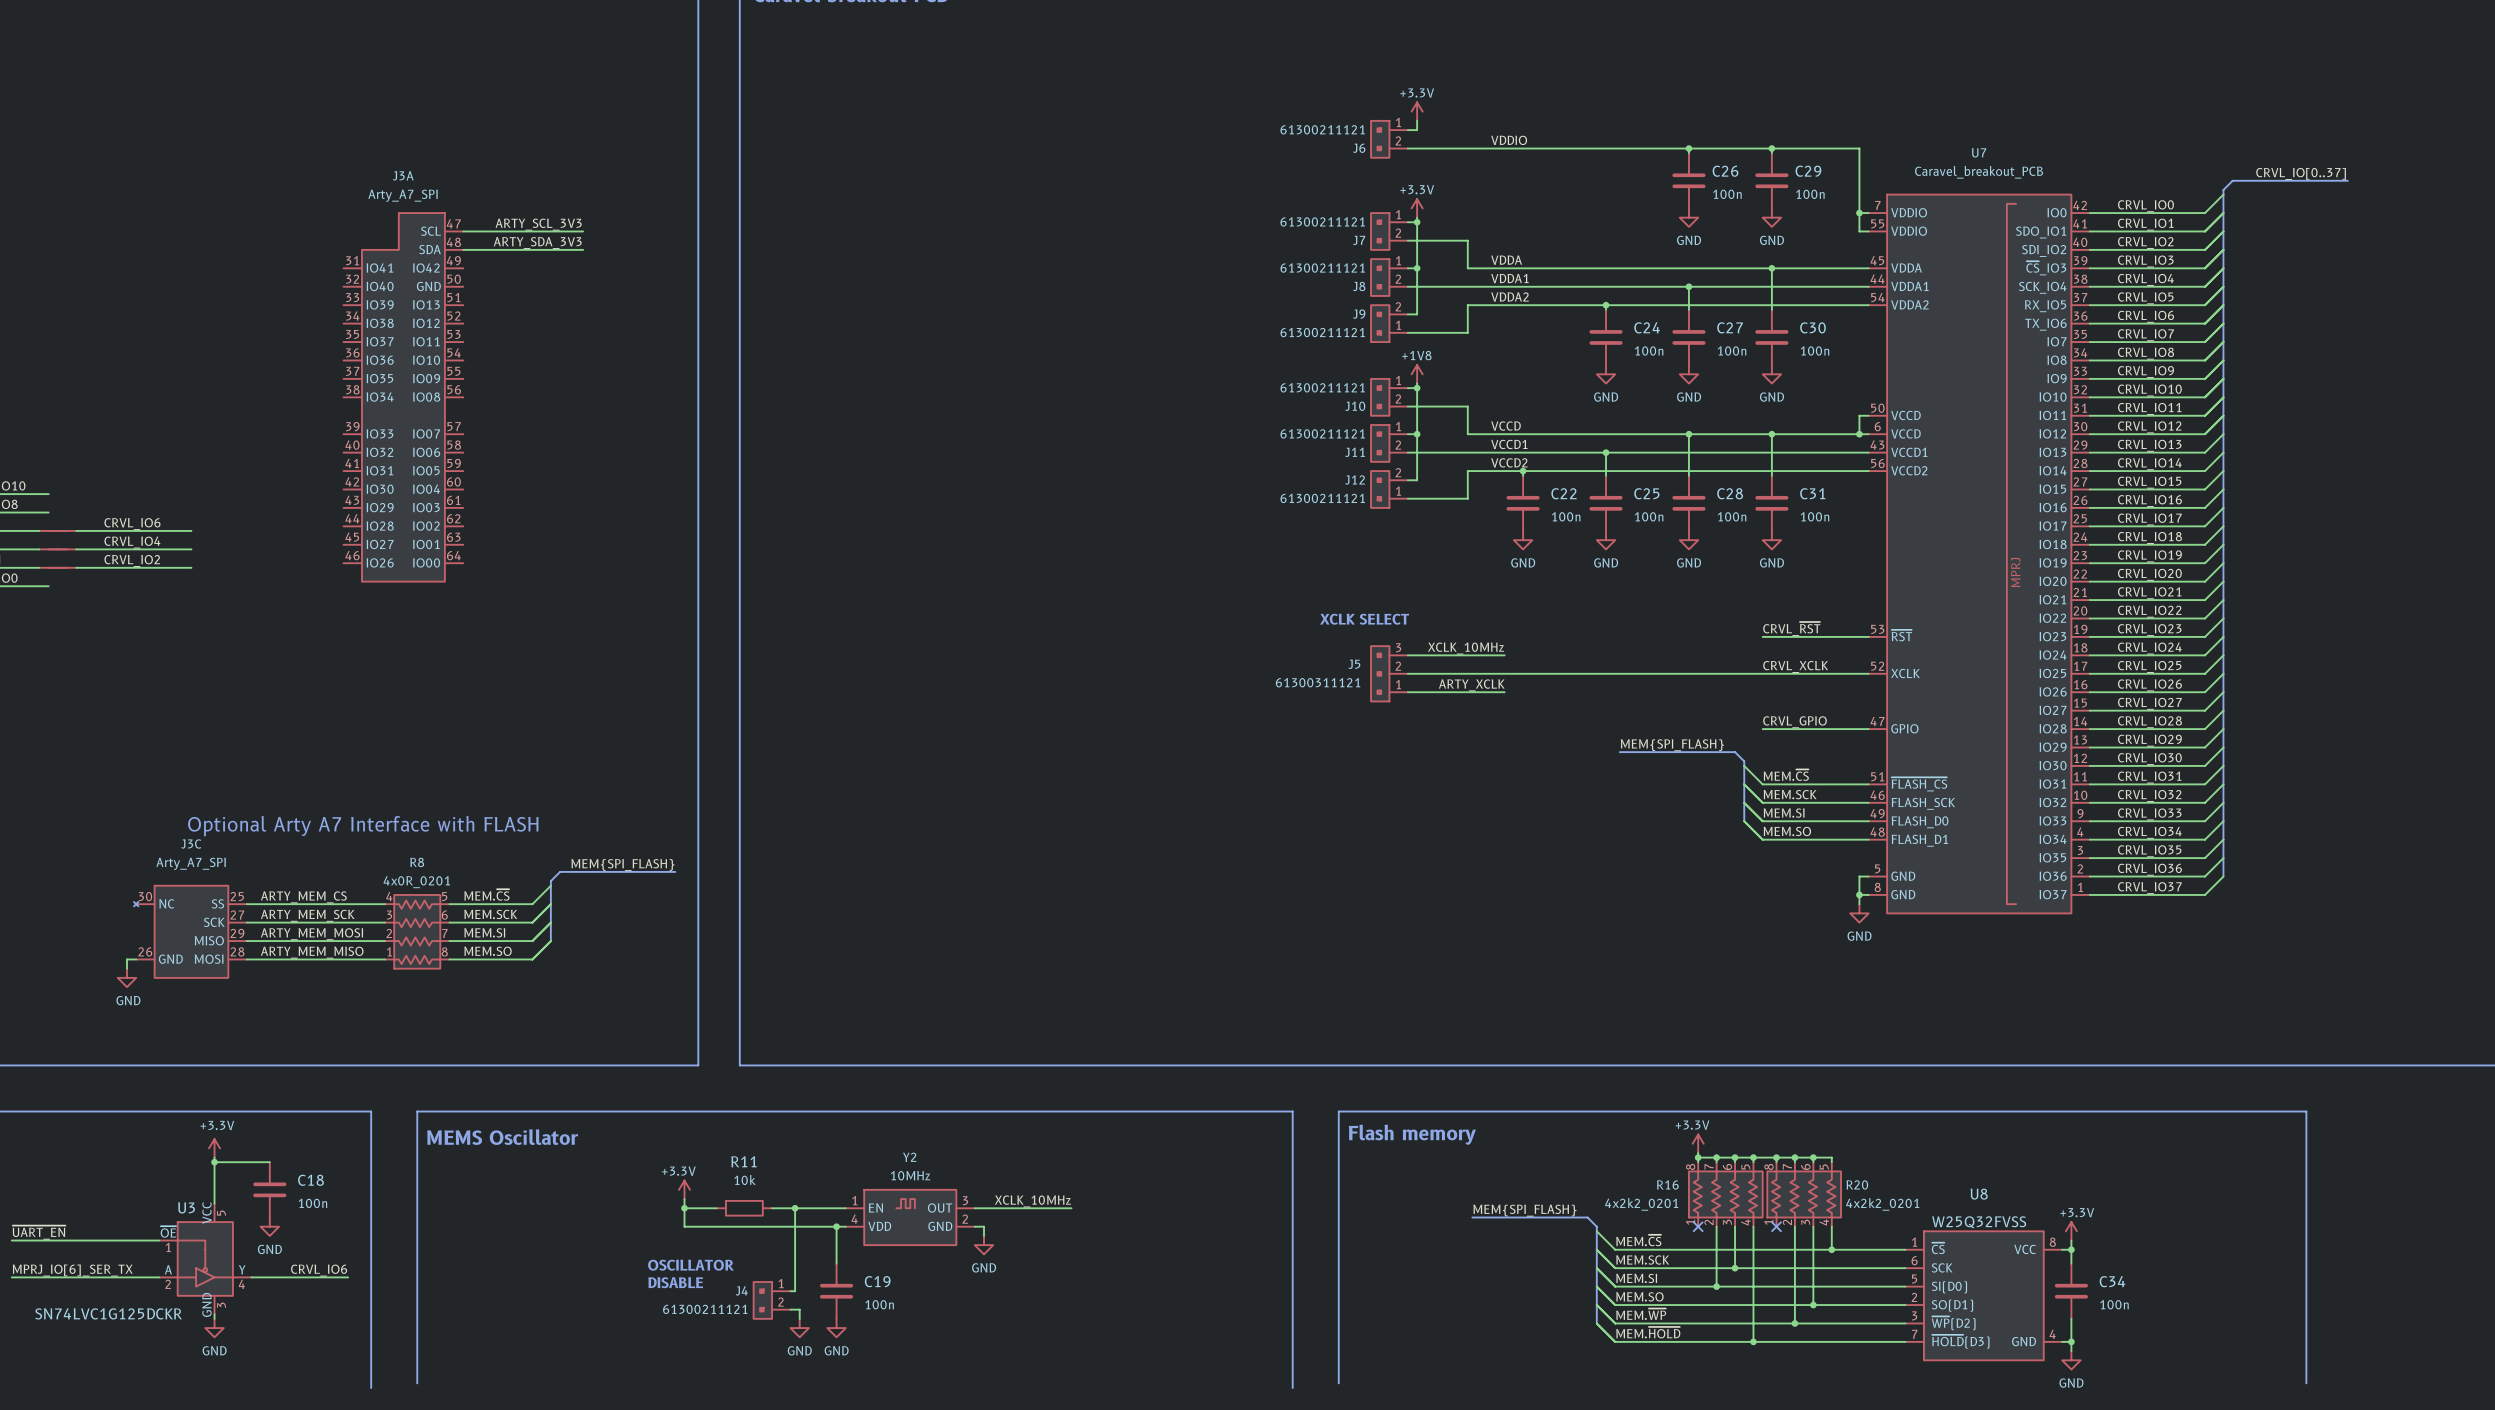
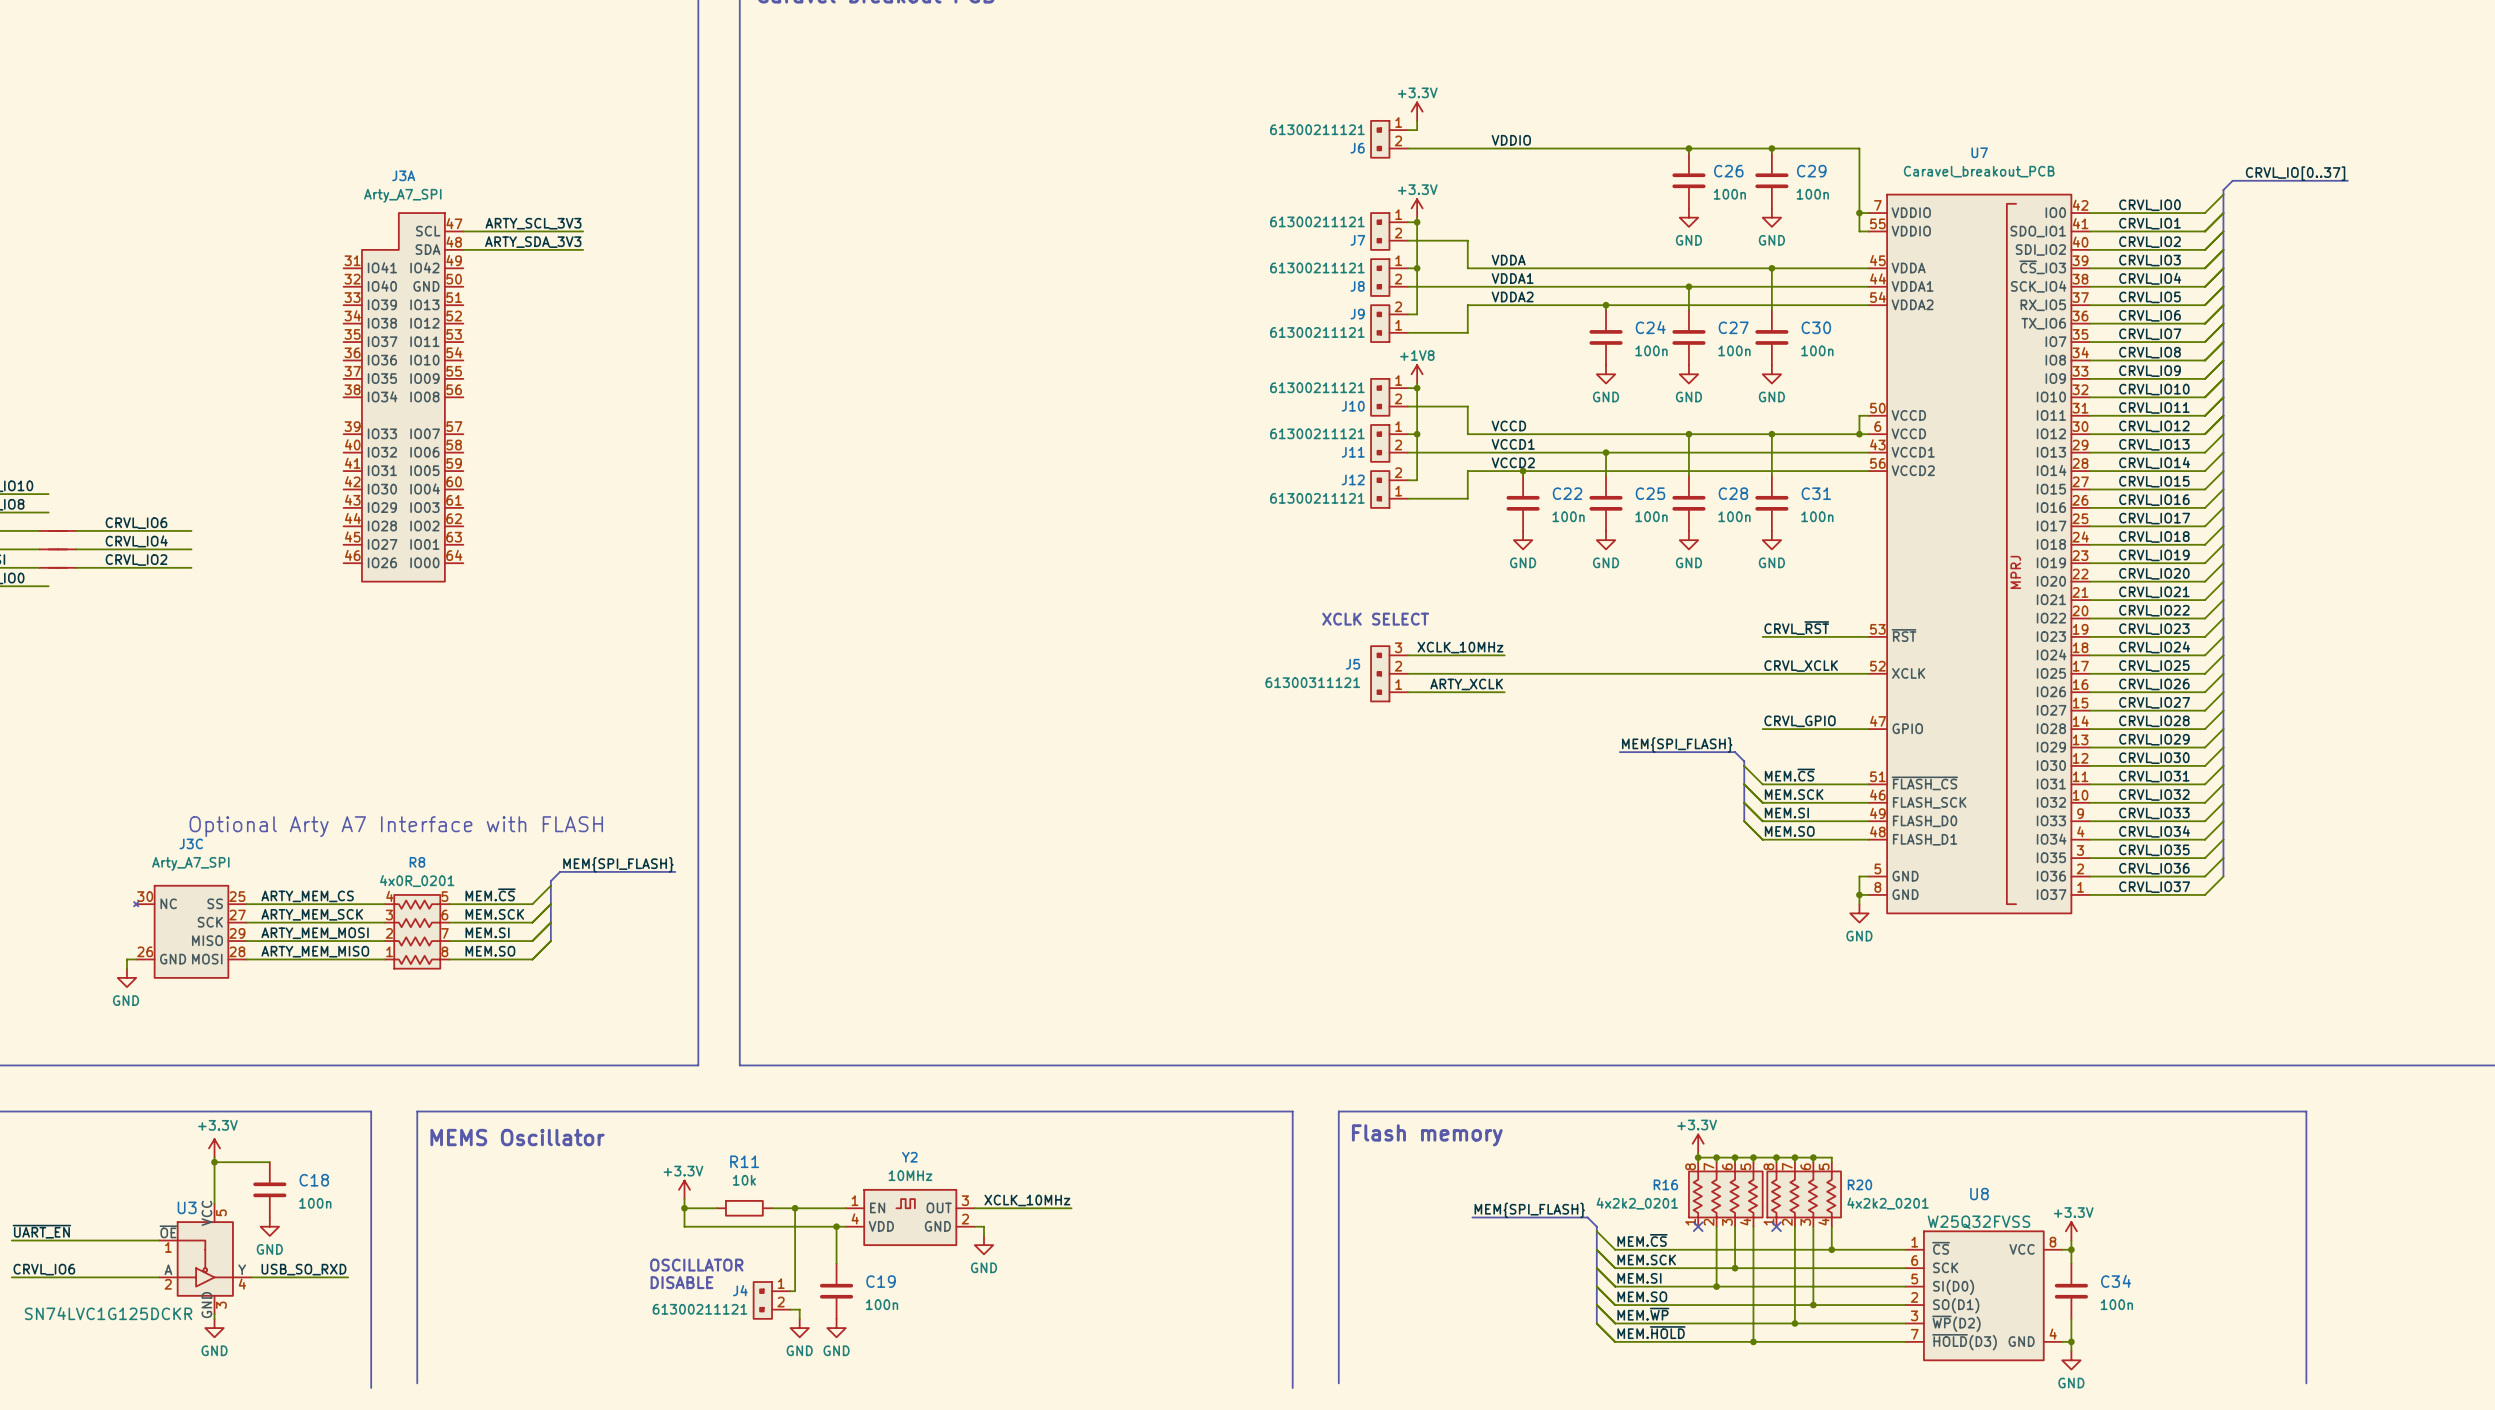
label: MPRJ_IO[6]_SER_TX (72, 1270) -> CRVL_IO6 (44, 1269)
label: CRVL_IO6 (319, 1270) -> USB_SO_RXD (303, 1269)

